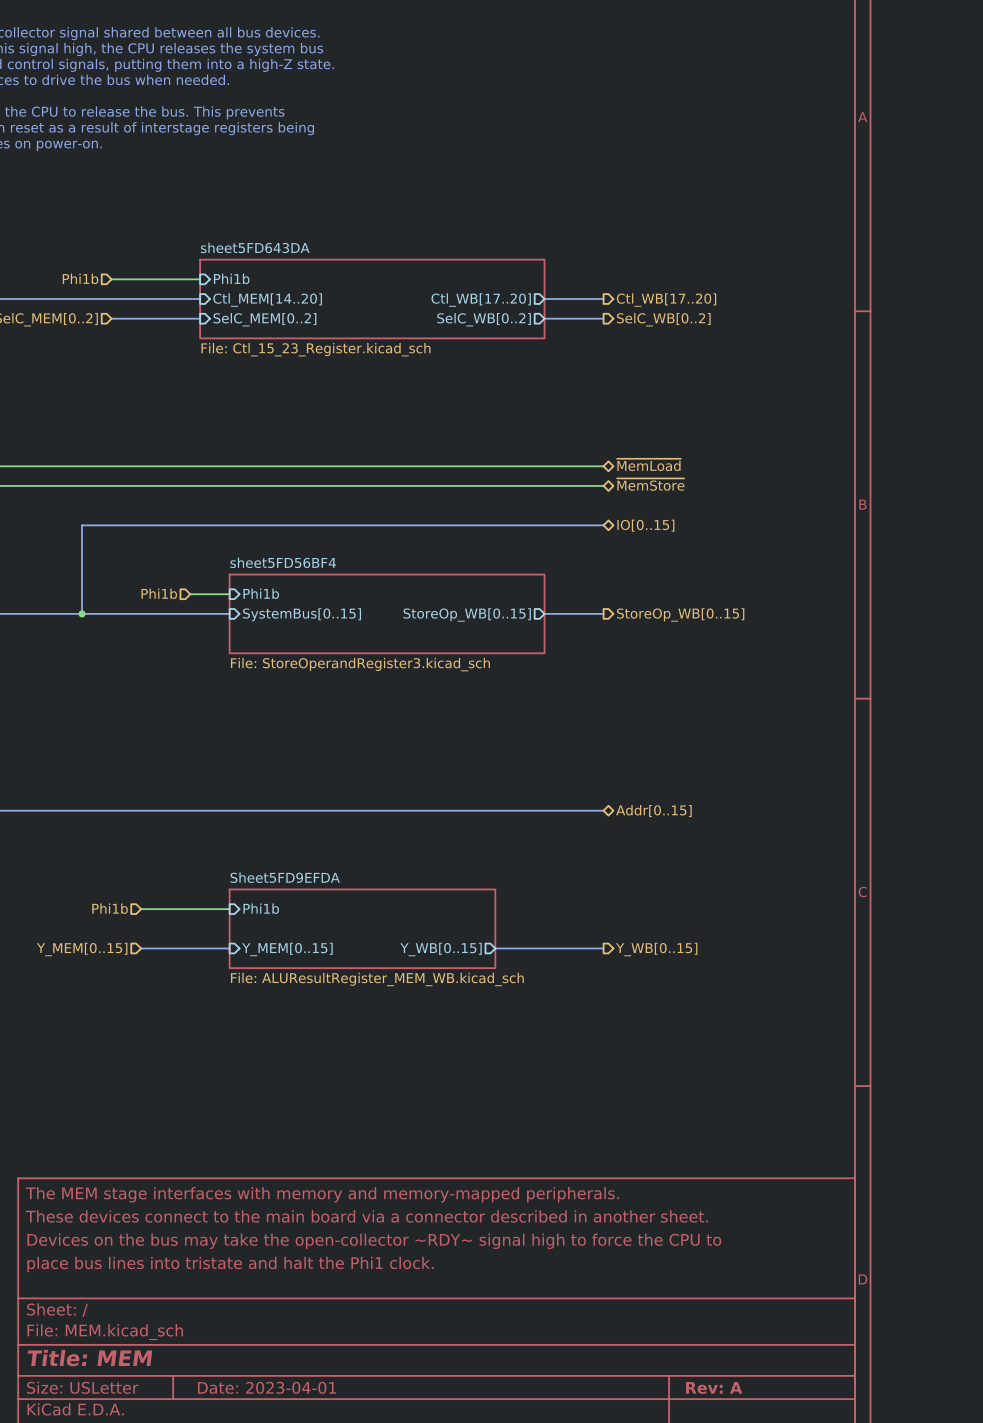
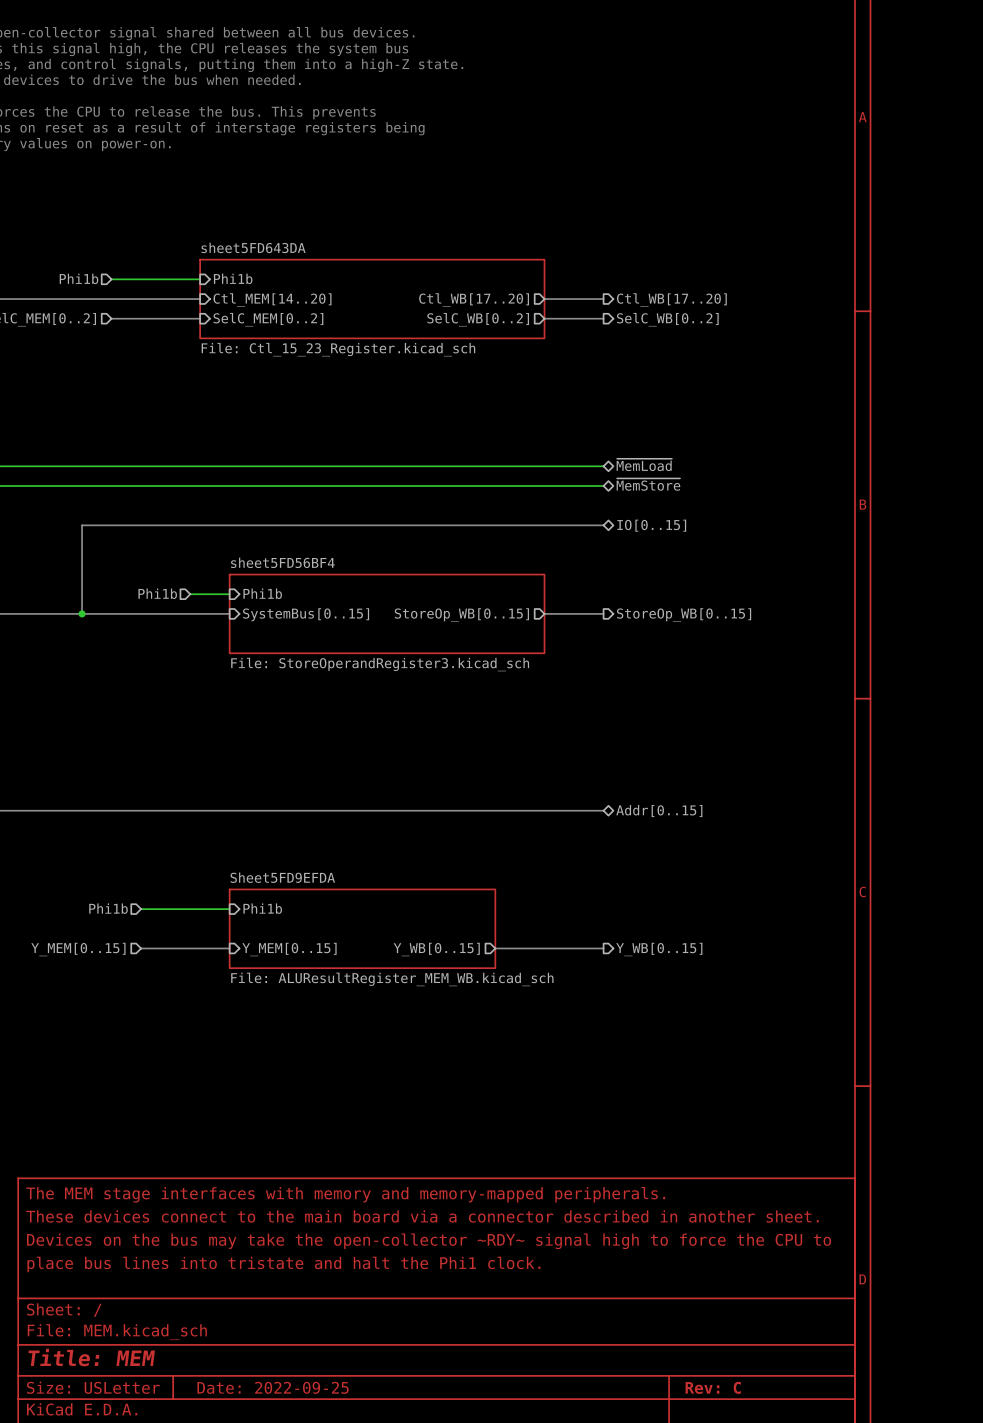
title block: Date: 2023-04-01 (267, 1387) -> Date: 2022-09-25 (273, 1387)
title block: Rev: A (714, 1387) -> Rev: C (713, 1387)

